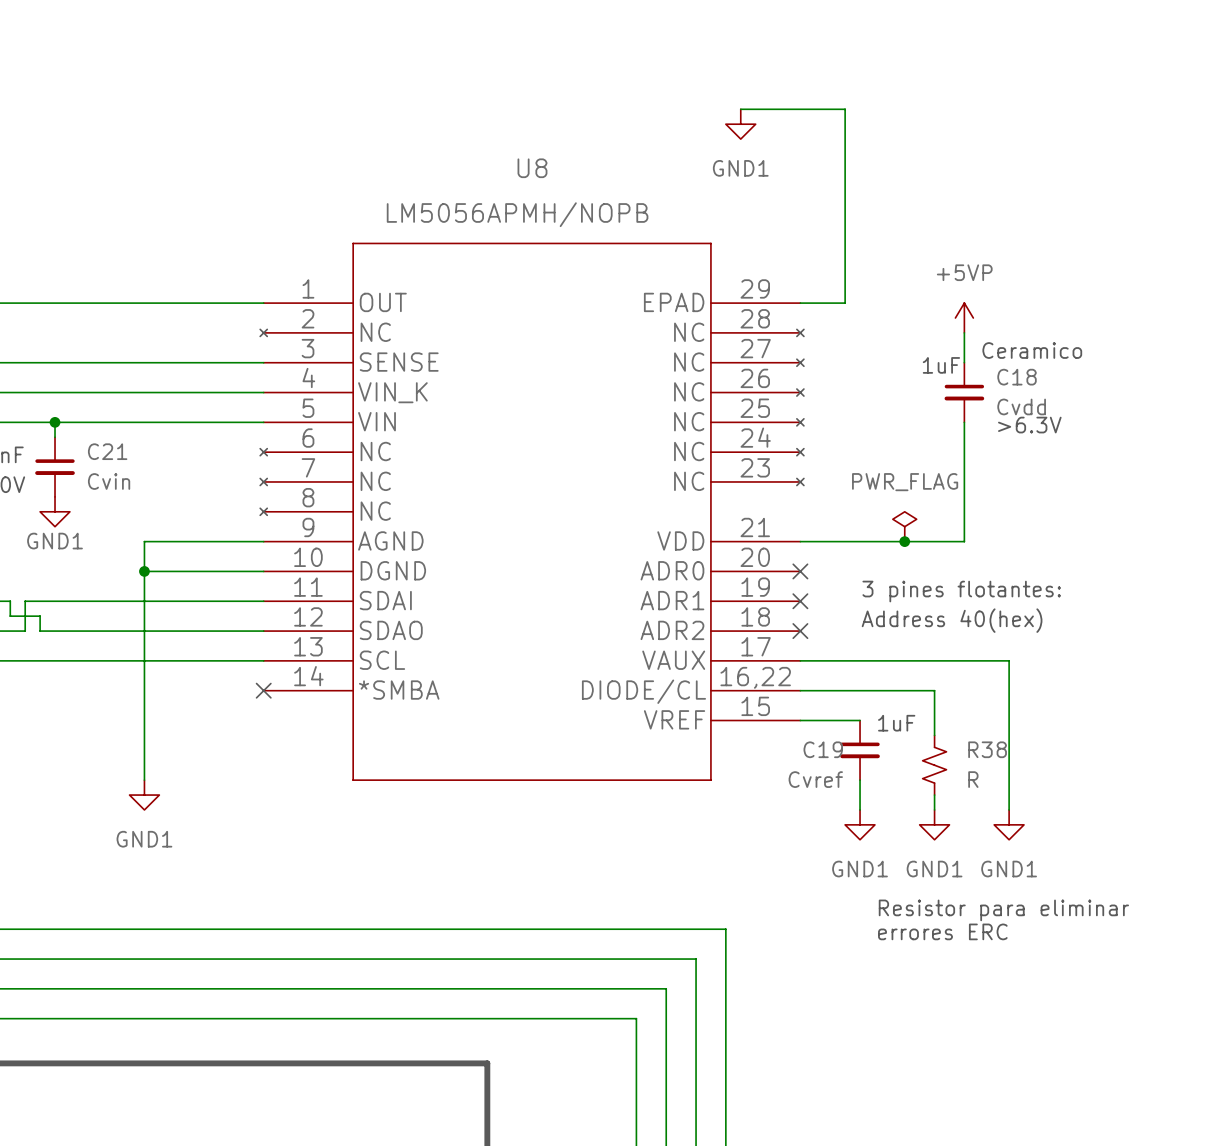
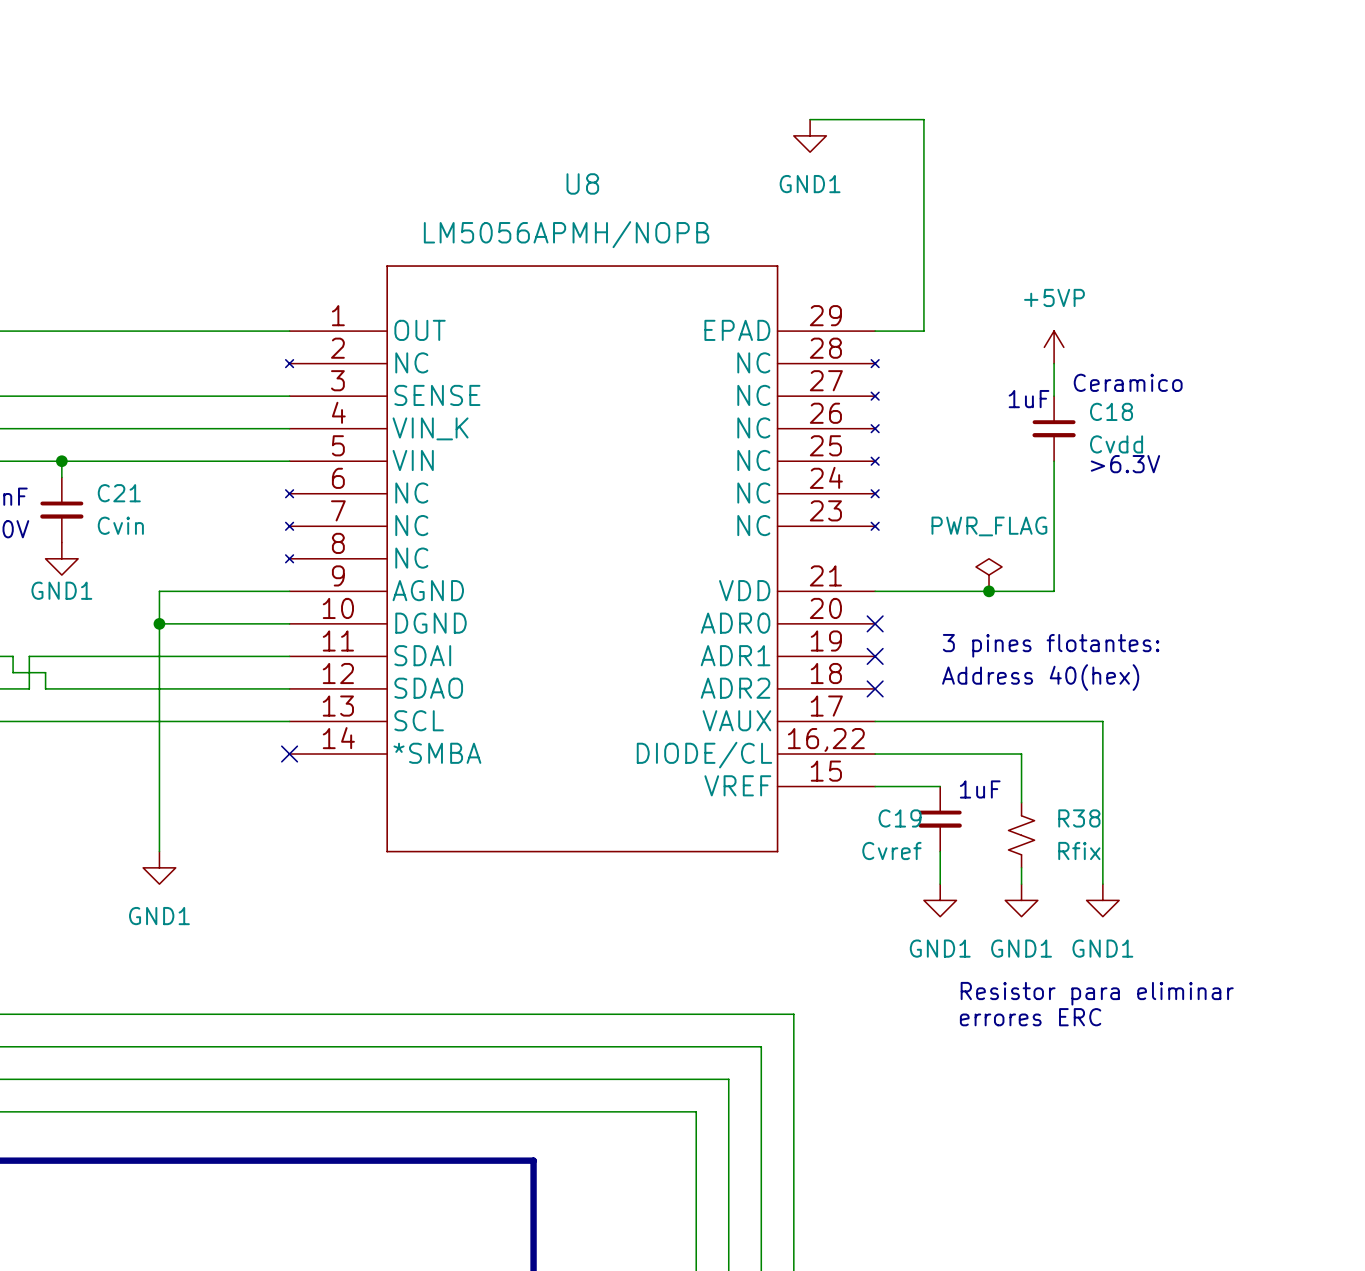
R38 value: R (973, 779) -> Rfix (1079, 850)

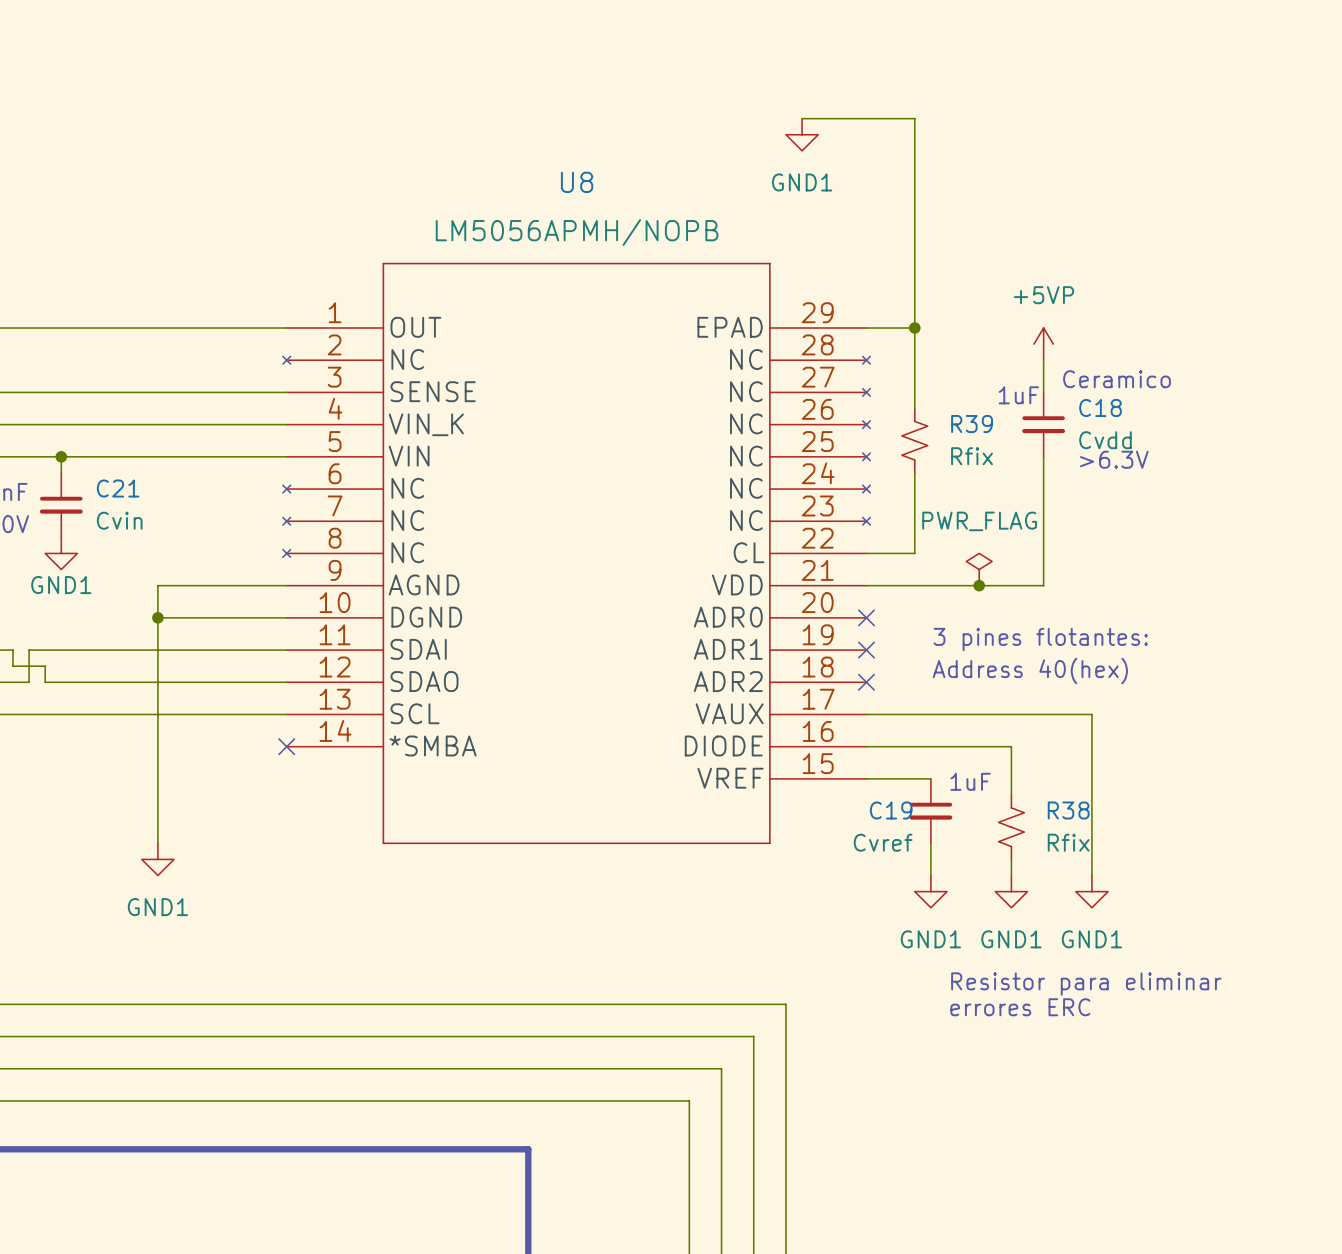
U8 symbol: [285, 265, 879, 853] -> [282, 262, 871, 845]
wire: none -> (914, 328) (914, 408)
junction: none -> (914, 328)
R39: none -> Rfix (914, 440)
wire: none -> (914, 472) (914, 553) (866, 553)

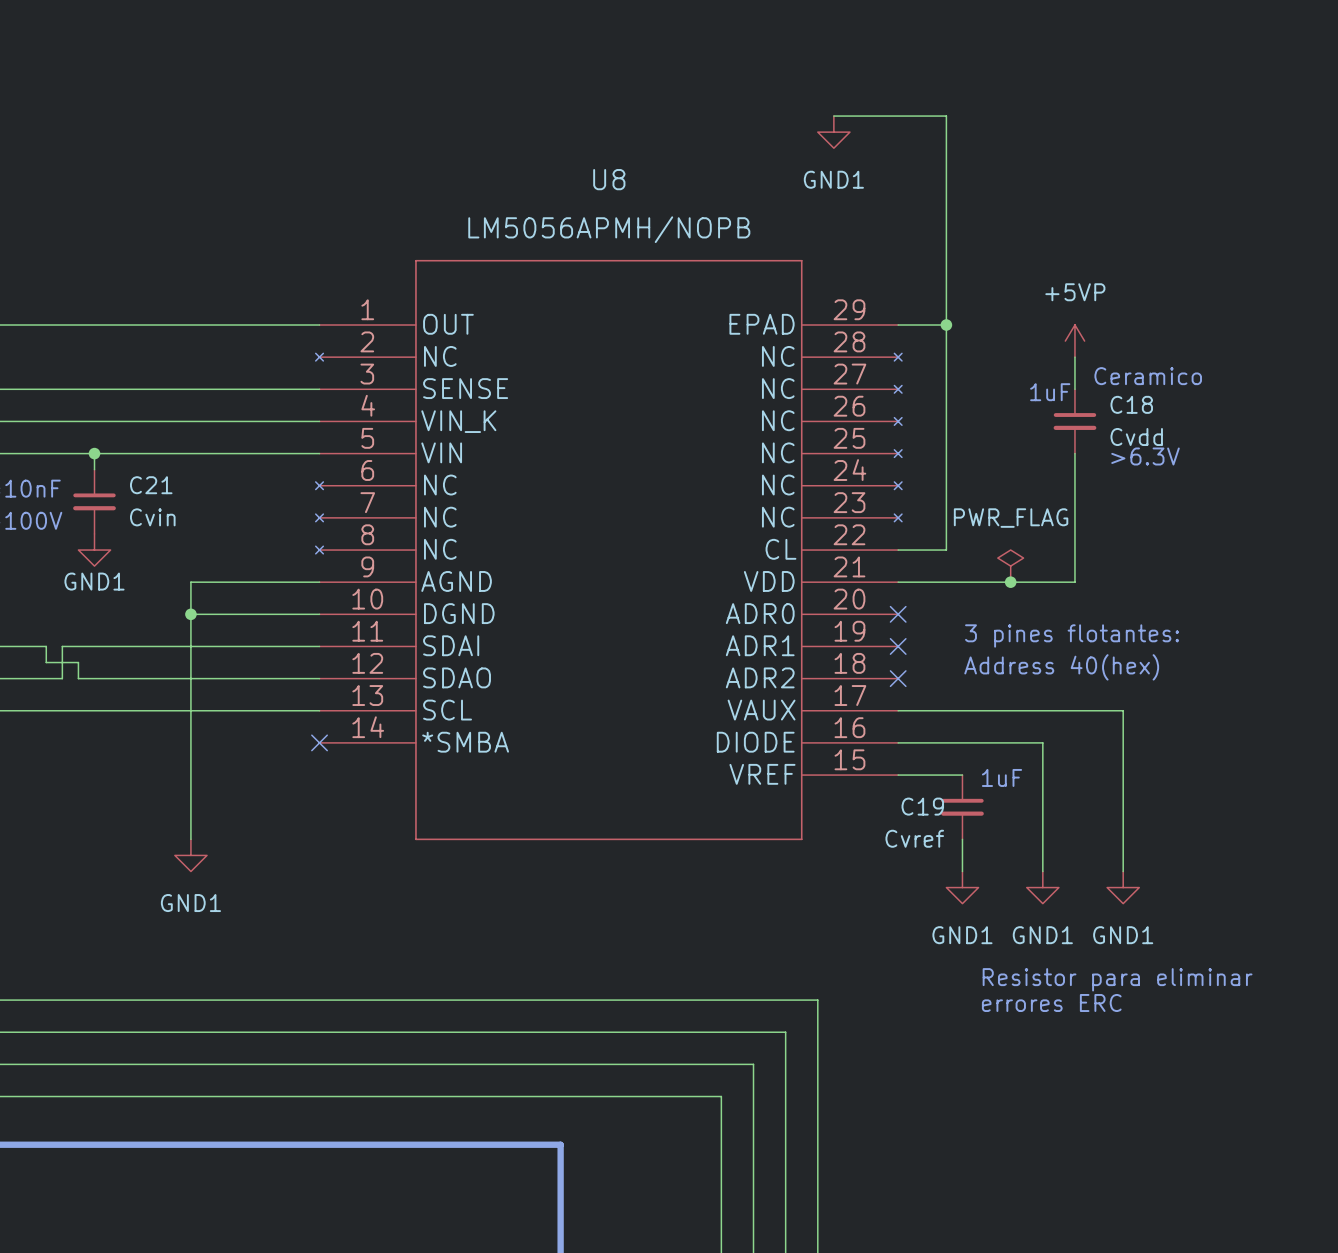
R39: Rfix (914, 440) -> none
R38: Rfix (1011, 827) -> none

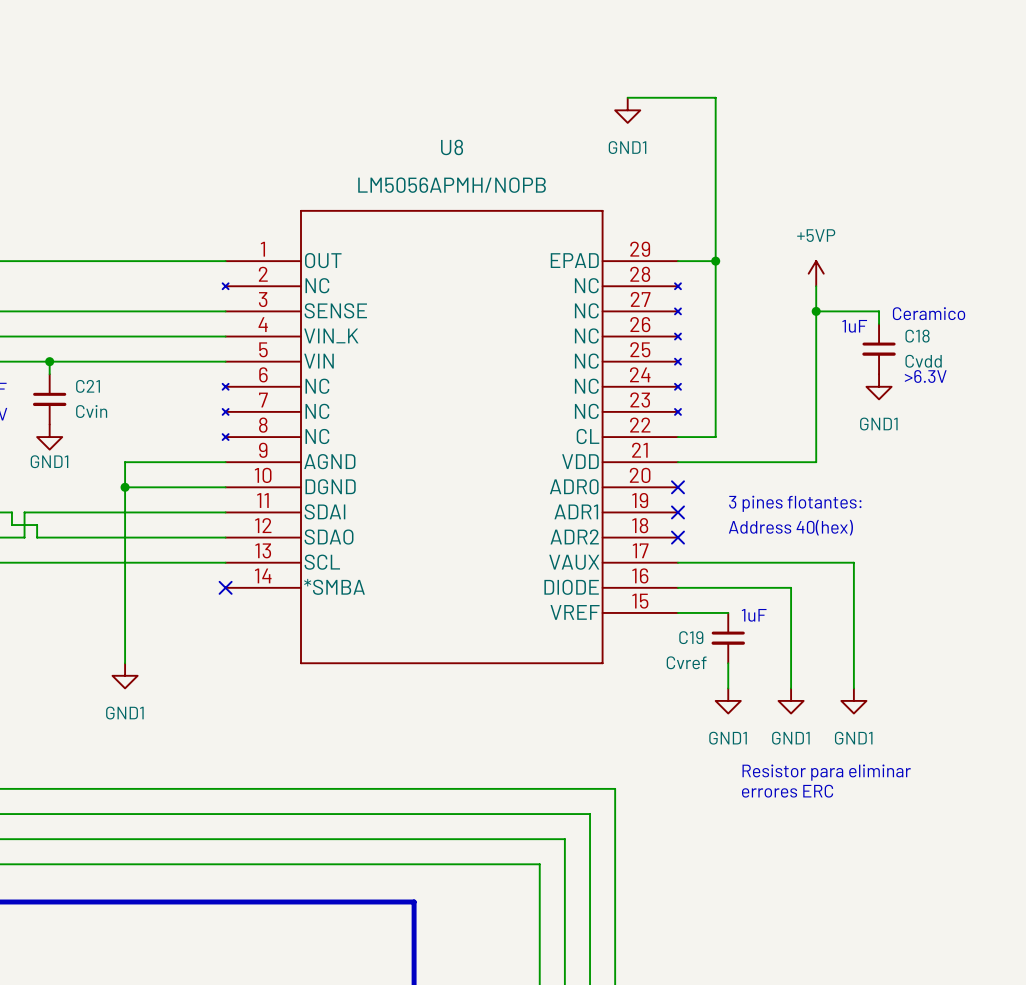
text position: Ceramico (1148, 376) -> Ceramico (929, 313)
junction: none -> (816, 311)
text position: 1uF (1050, 392) -> 1uF (854, 326)
wire: none -> (879, 323) (879, 311) (816, 311) (816, 361)
C18 position: (1074, 421) -> (879, 349)
text position: >6.3V (1145, 456) -> >6.3V (925, 376)
power symbol: none -> GND1 (879, 386)
power symbol: PWR_FLAG (1010, 566) -> none
junction: (1010, 582) -> none

